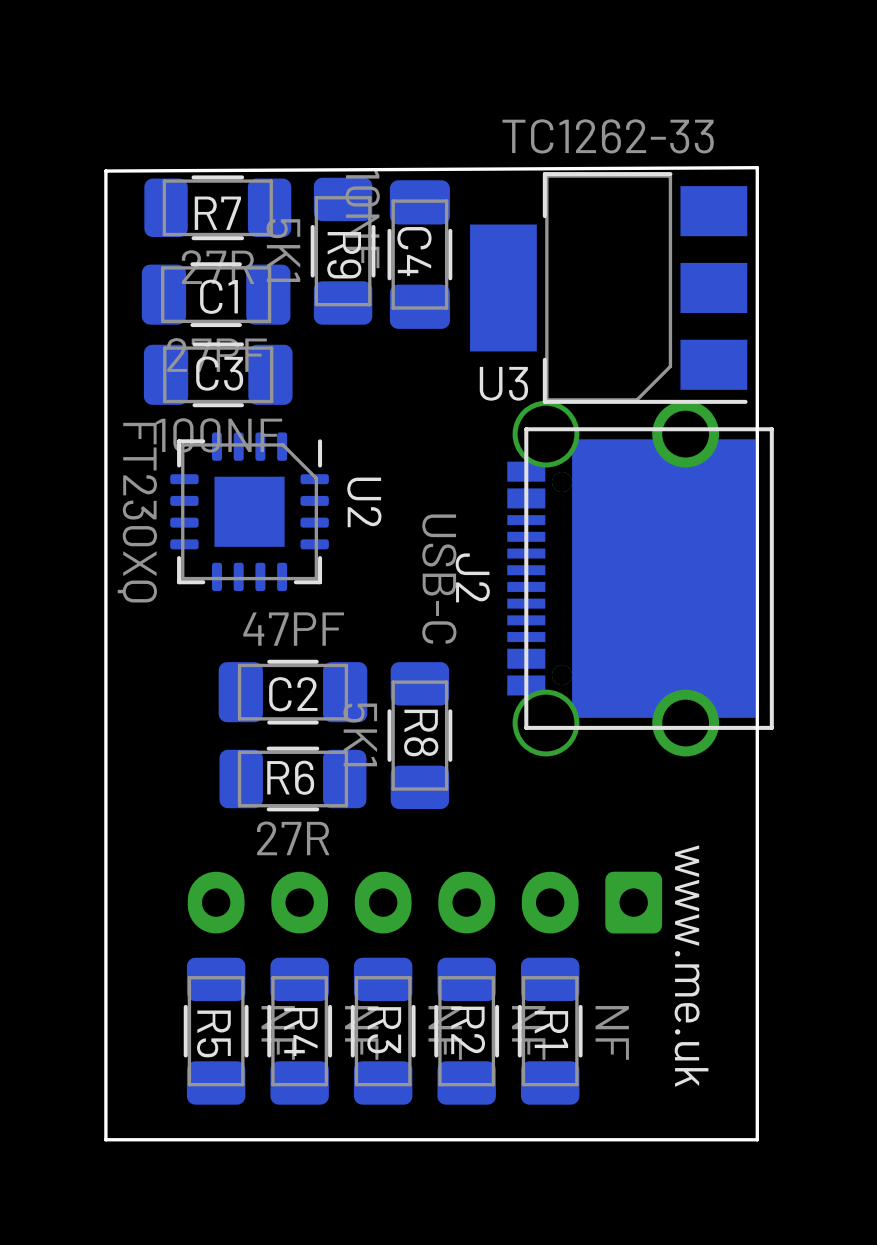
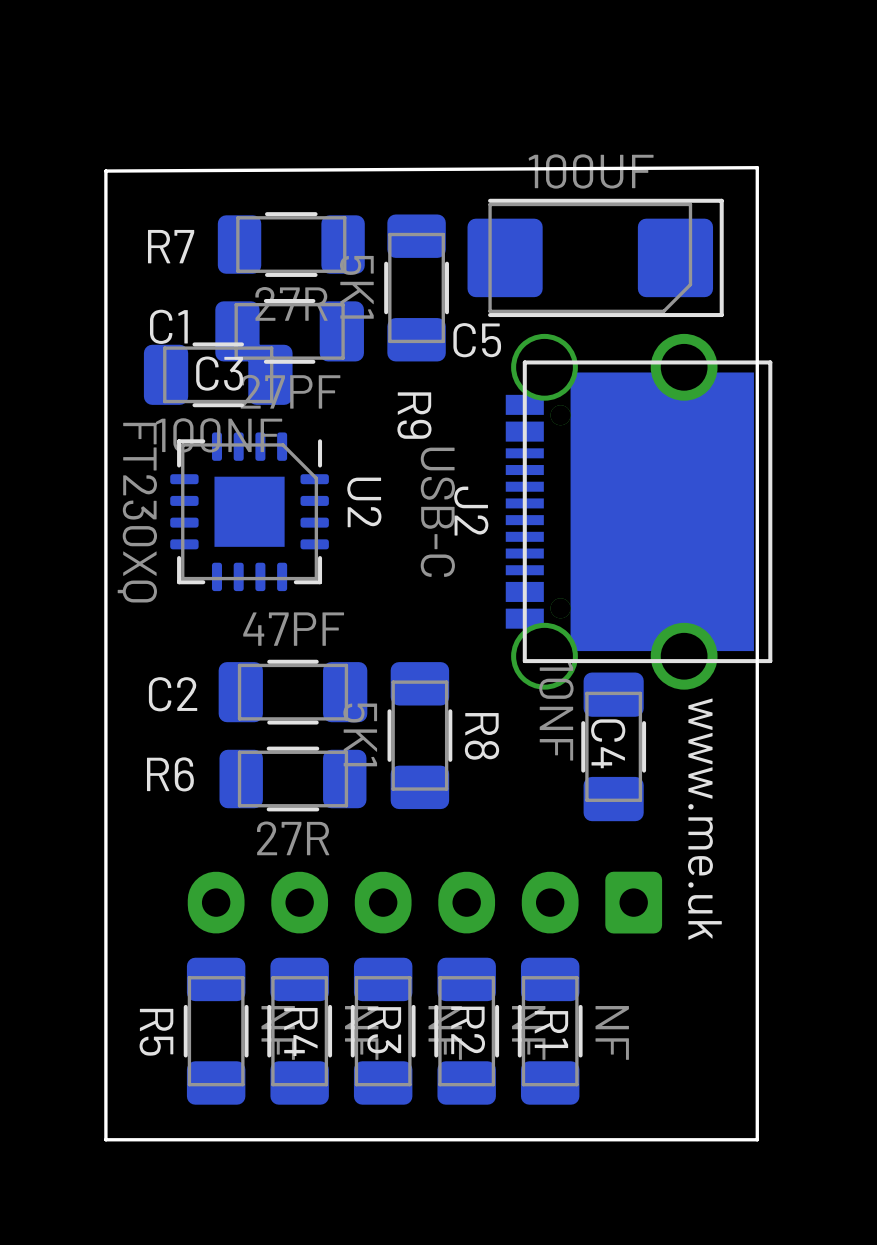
R7 position: (217, 207) -> (291, 244)
R7 name position: R7 (217, 213) -> R7 (171, 246)
R9 position: (343, 251) -> (416, 287)
C4 position: (419, 254) -> (613, 746)
R9 name position: R9 (344, 255) -> R9 (414, 415)
C5: none -> 100UF (595, 257)
U3: TC1262-33 (608, 287) -> none
C1 position: (216, 294) -> (289, 331)
C1 name position: C1 (218, 296) -> C1 (168, 326)
J2 position: (640, 578) -> (639, 511)
C2 name position: C2 (293, 694) -> C2 (173, 694)
R8 name position: R8 (421, 733) -> R8 (482, 736)
R6 name position: R6 (290, 777) -> R6 (170, 774)
text position: www.me.uk (691, 966) -> www.me.uk (704, 819)
R5 name position: R5 (213, 1033) -> R5 (156, 1032)

